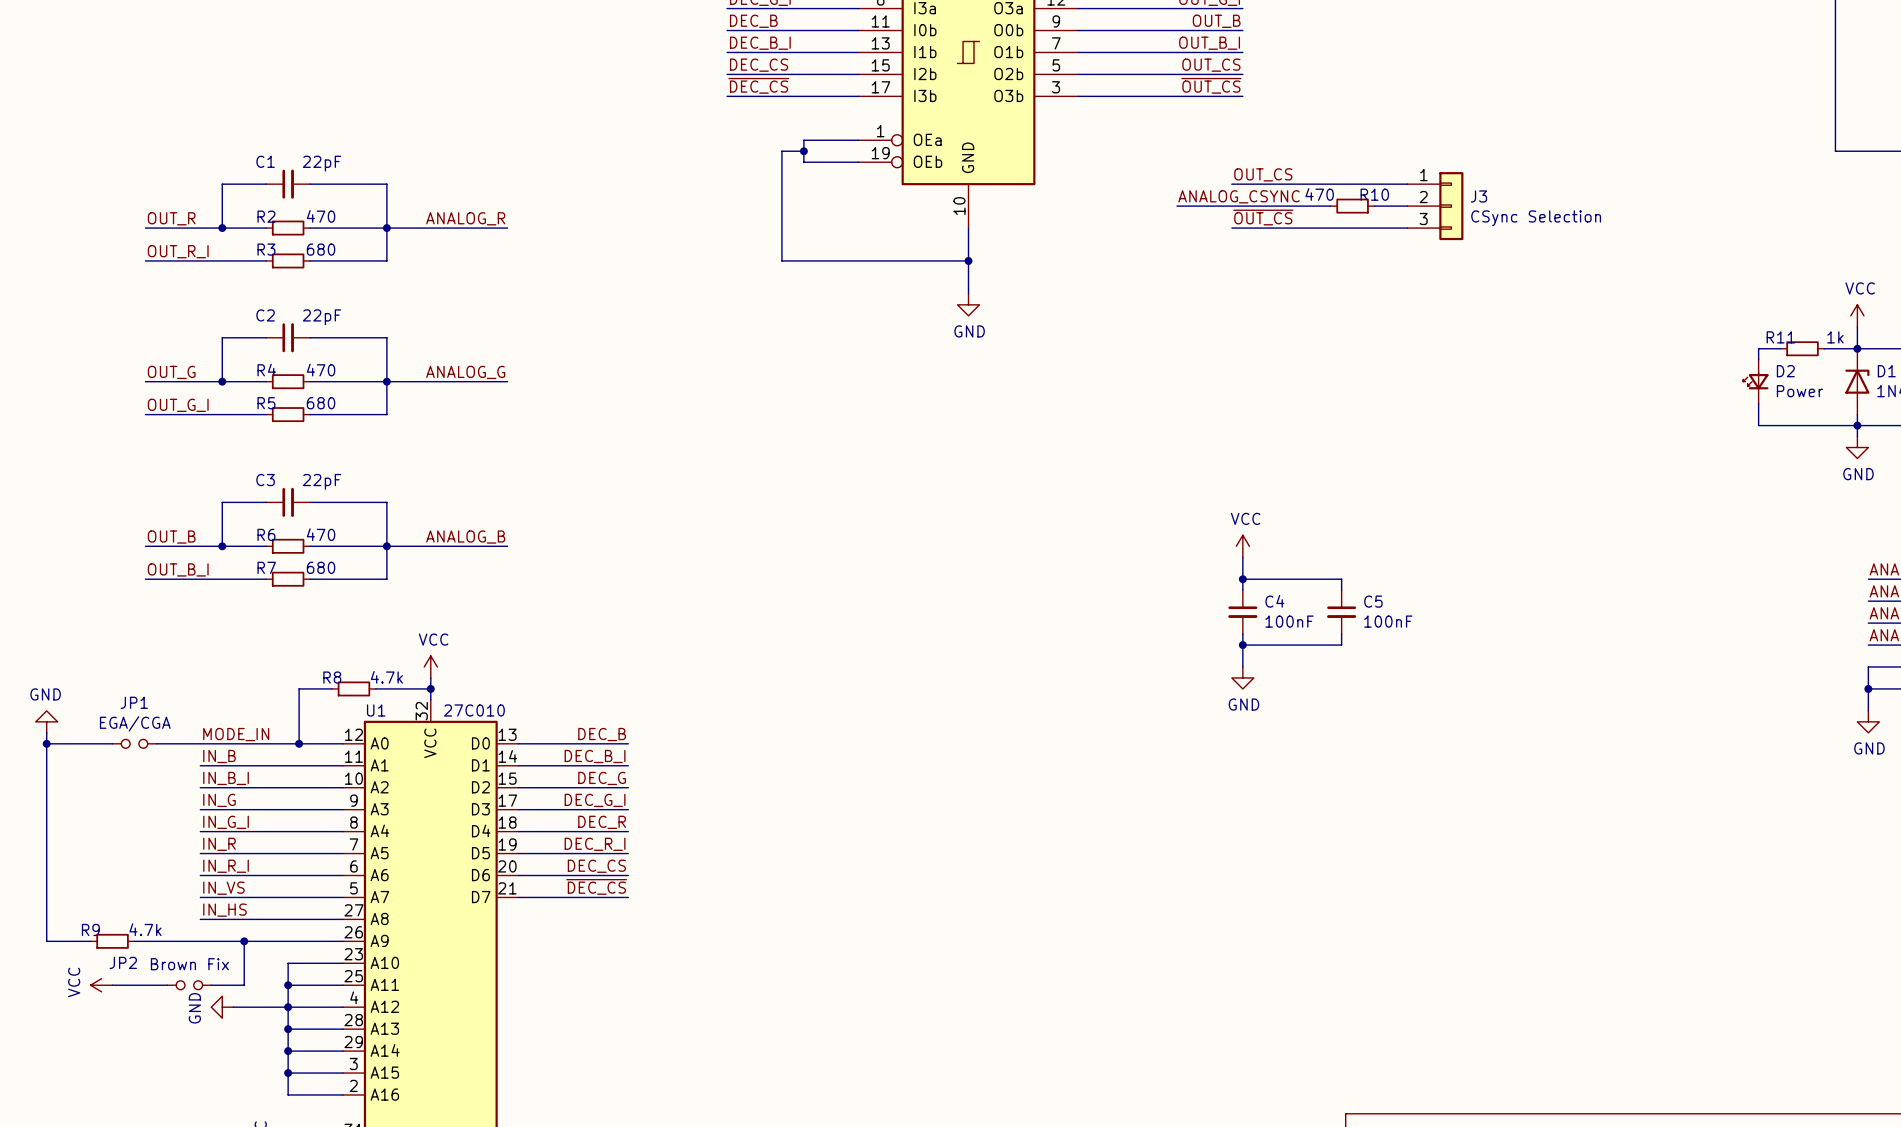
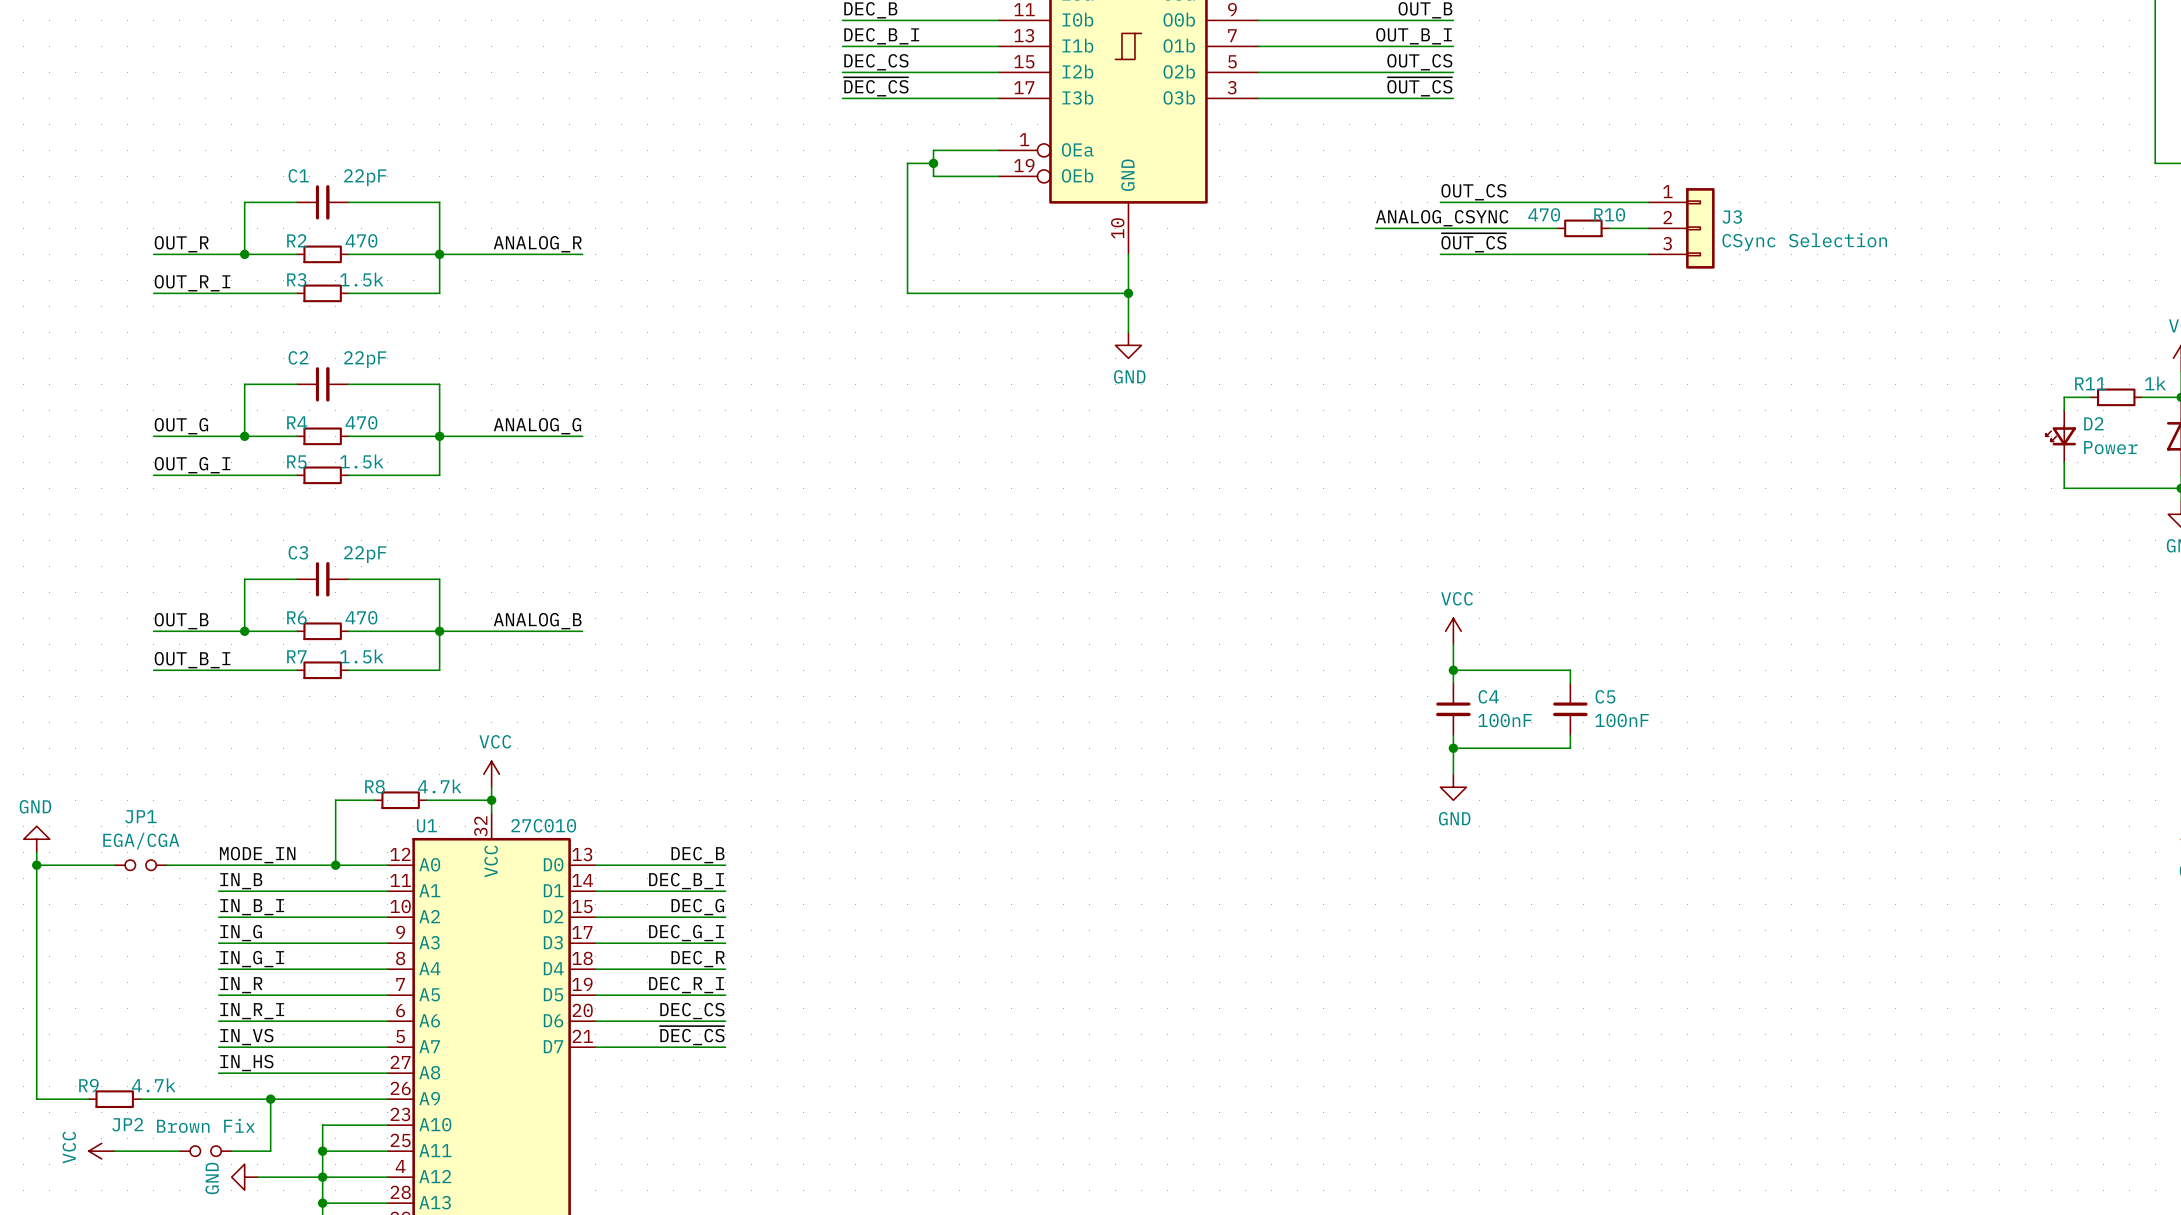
R3 value: 680 (321, 249) -> 1.5k (361, 279)
R5 value: 680 (321, 403) -> 1.5k (361, 461)
R7 value: 680 (321, 567) -> 1.5k (361, 656)

